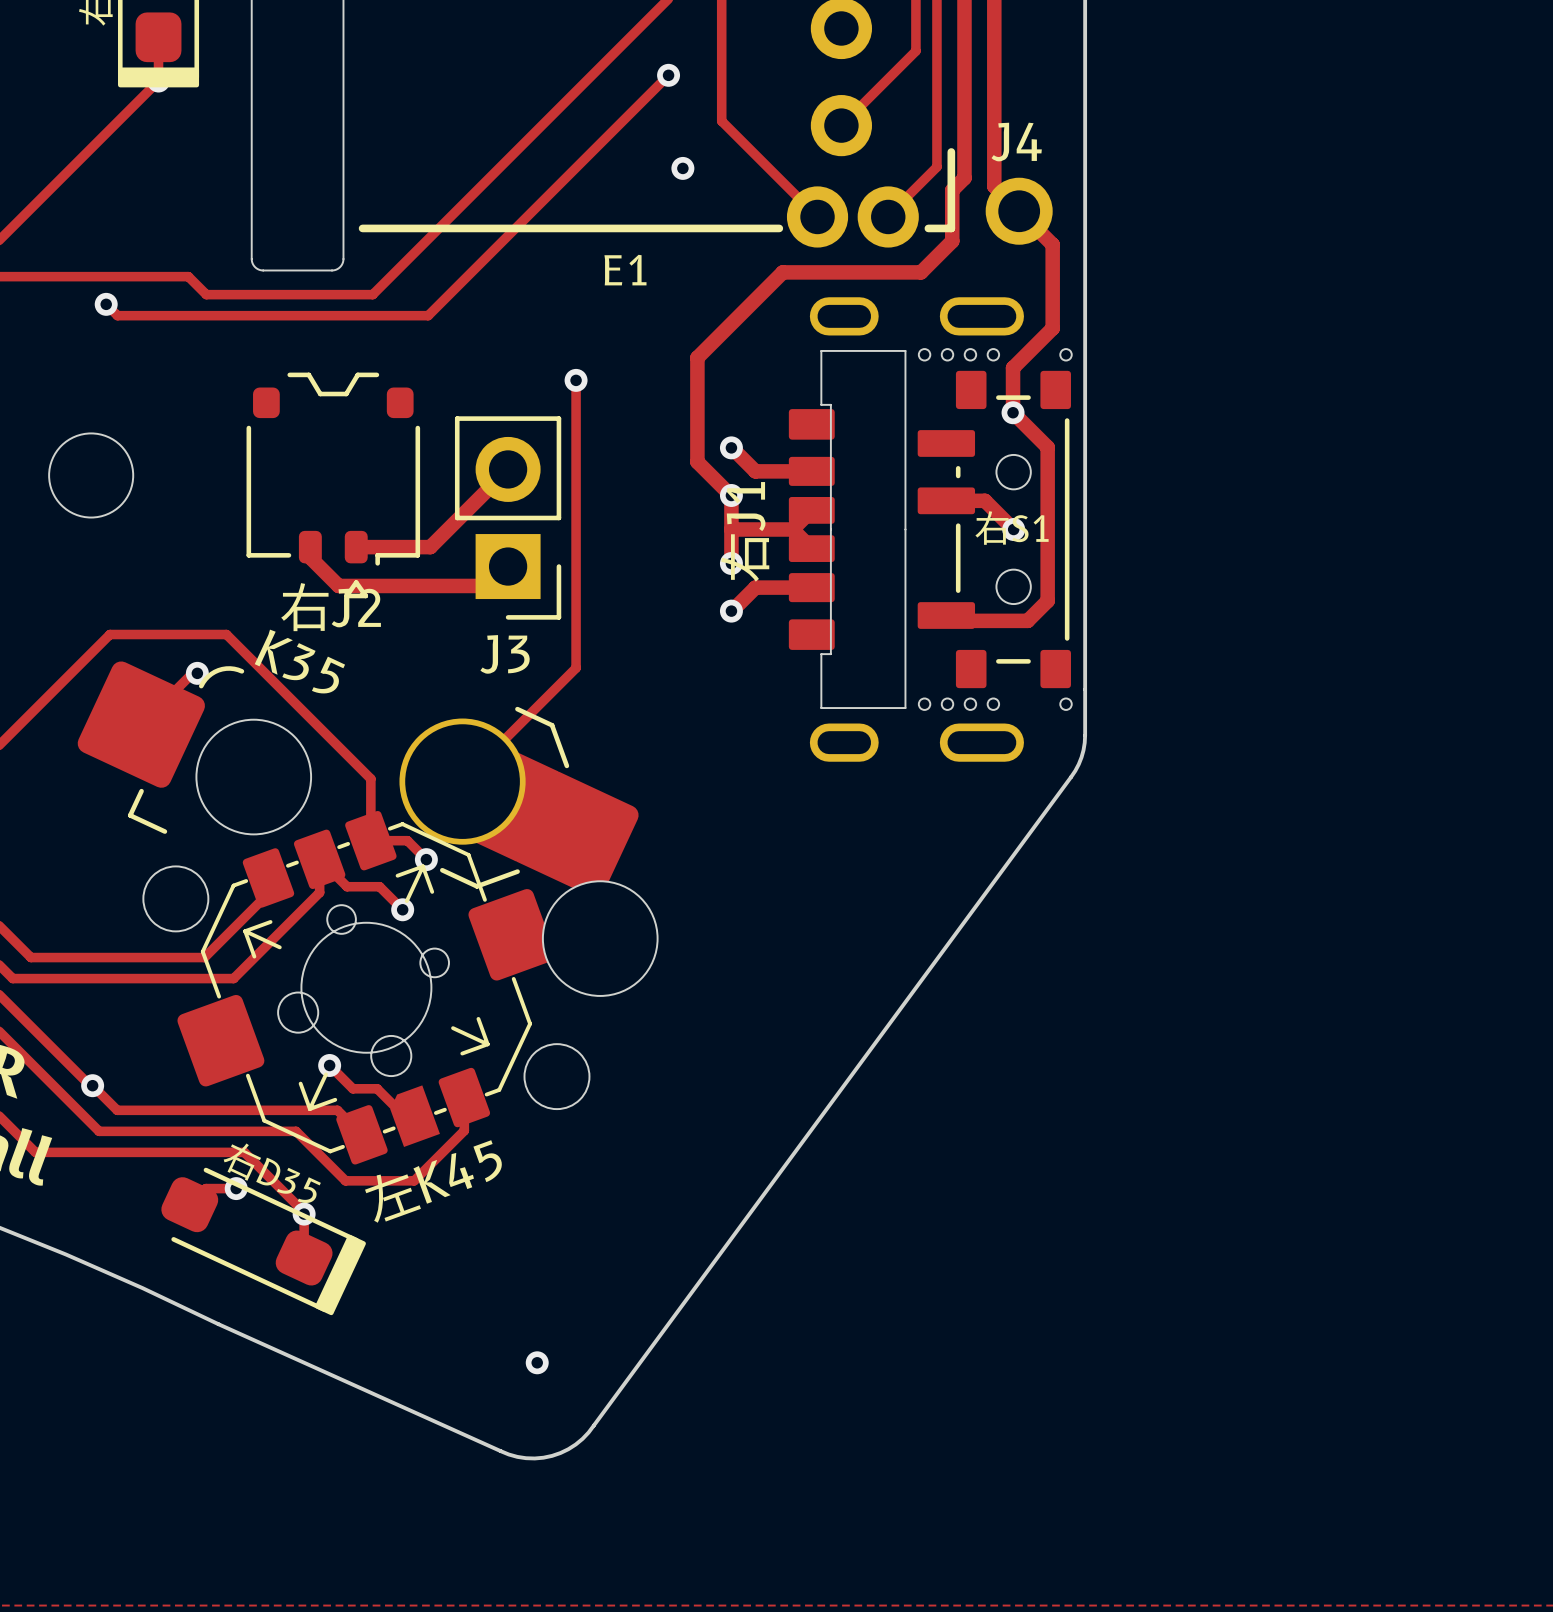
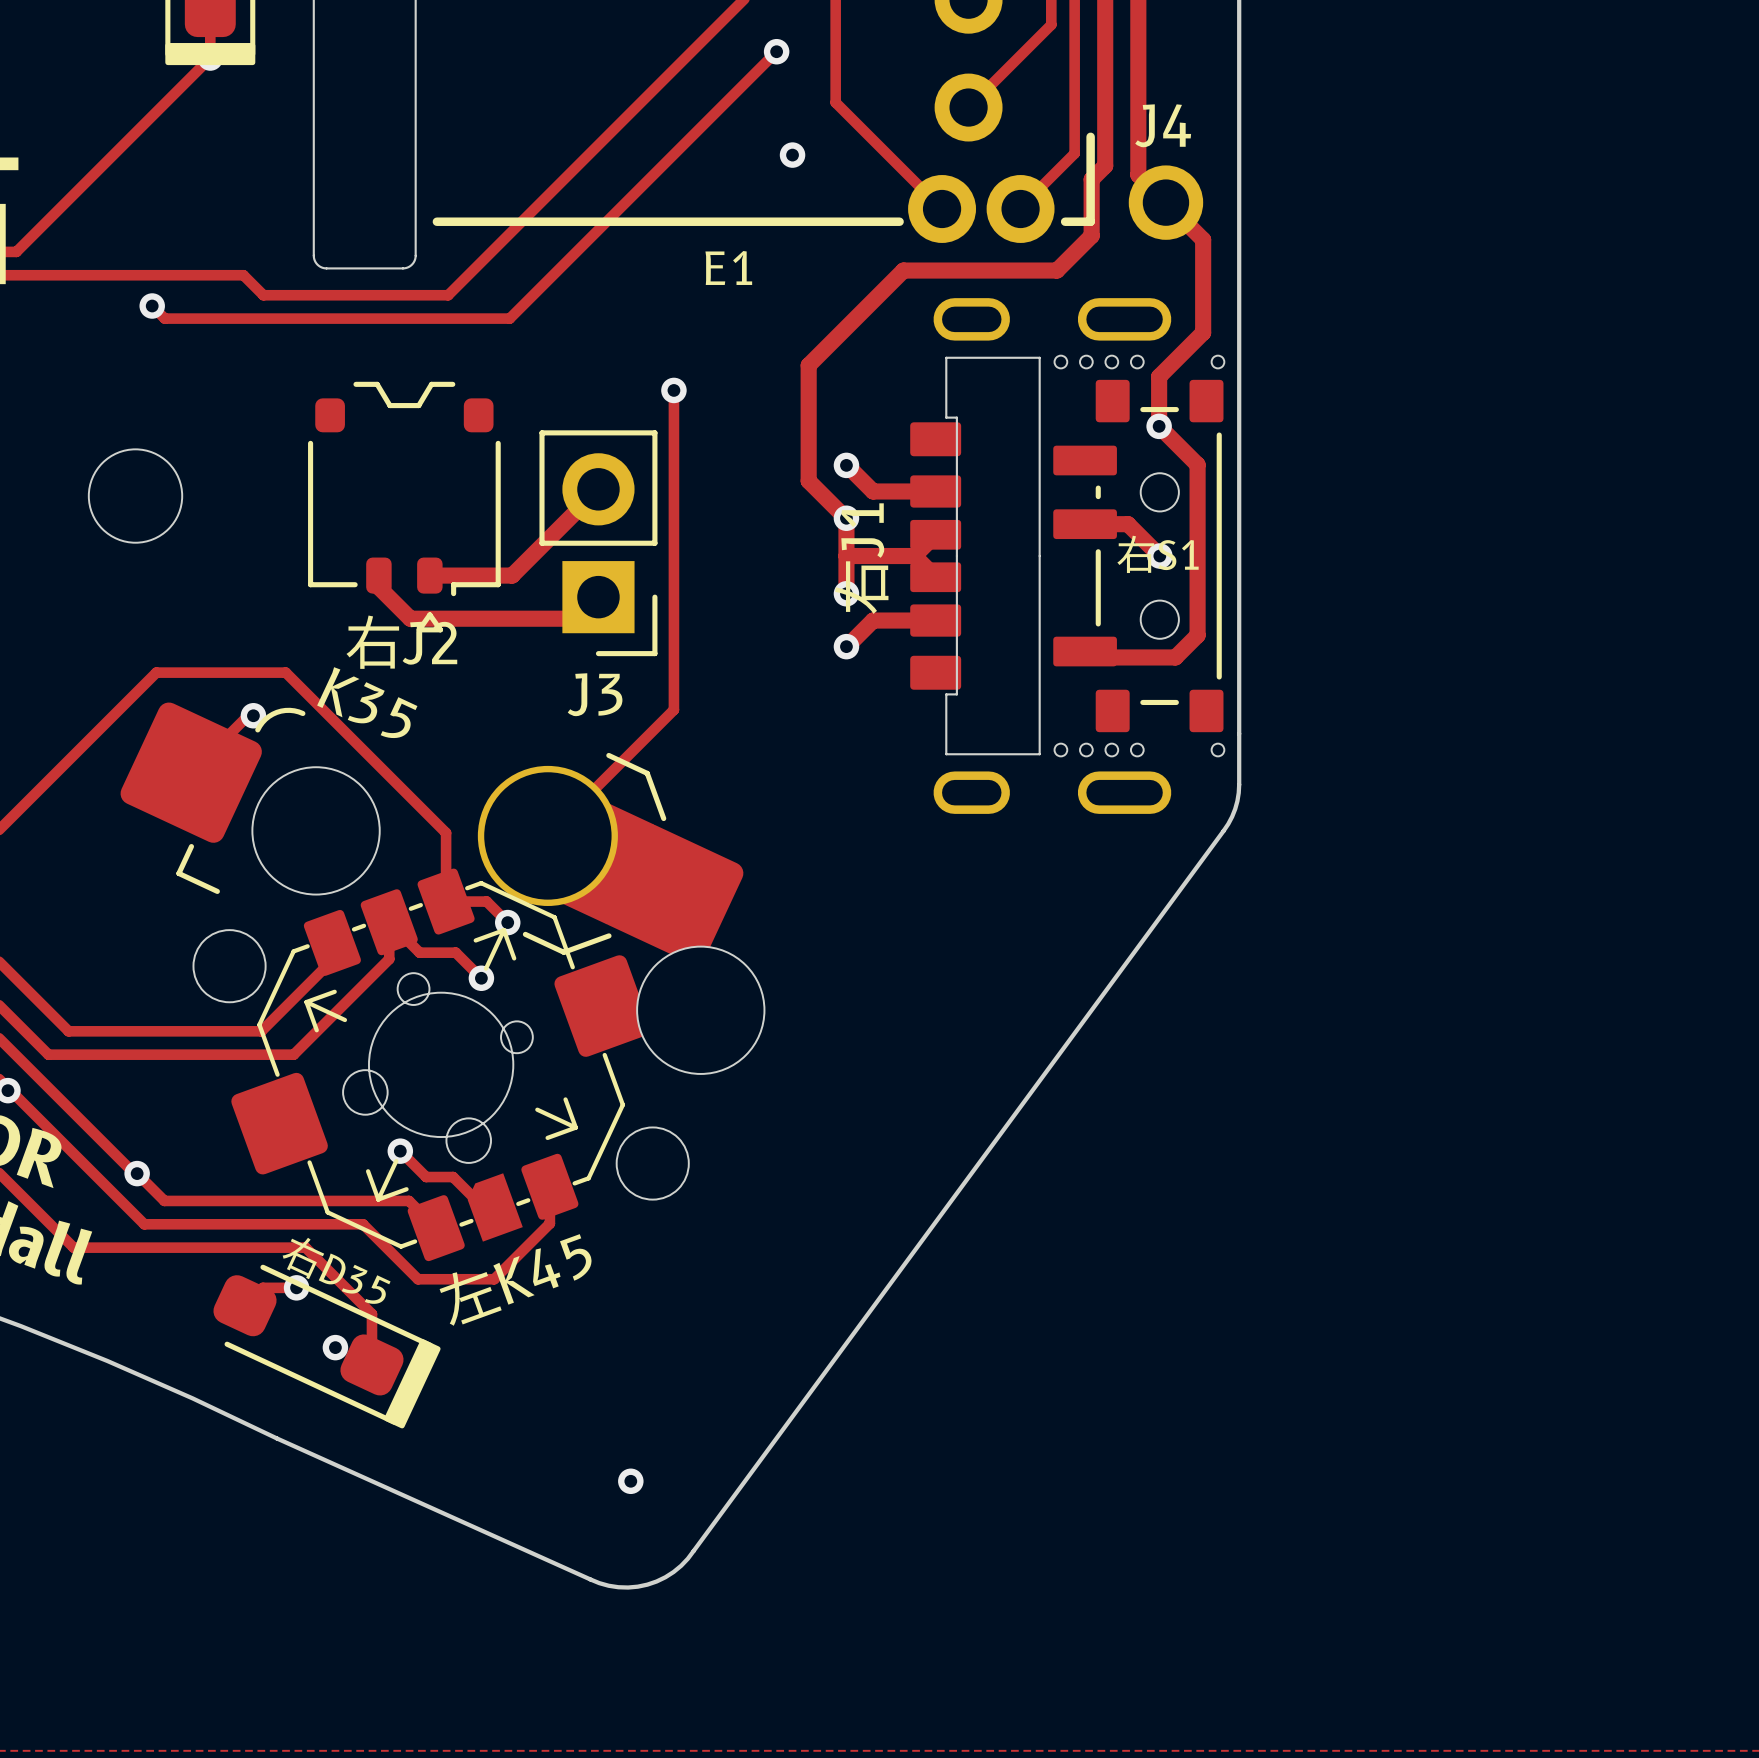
via position: (304, 1214) -> (335, 1347)

